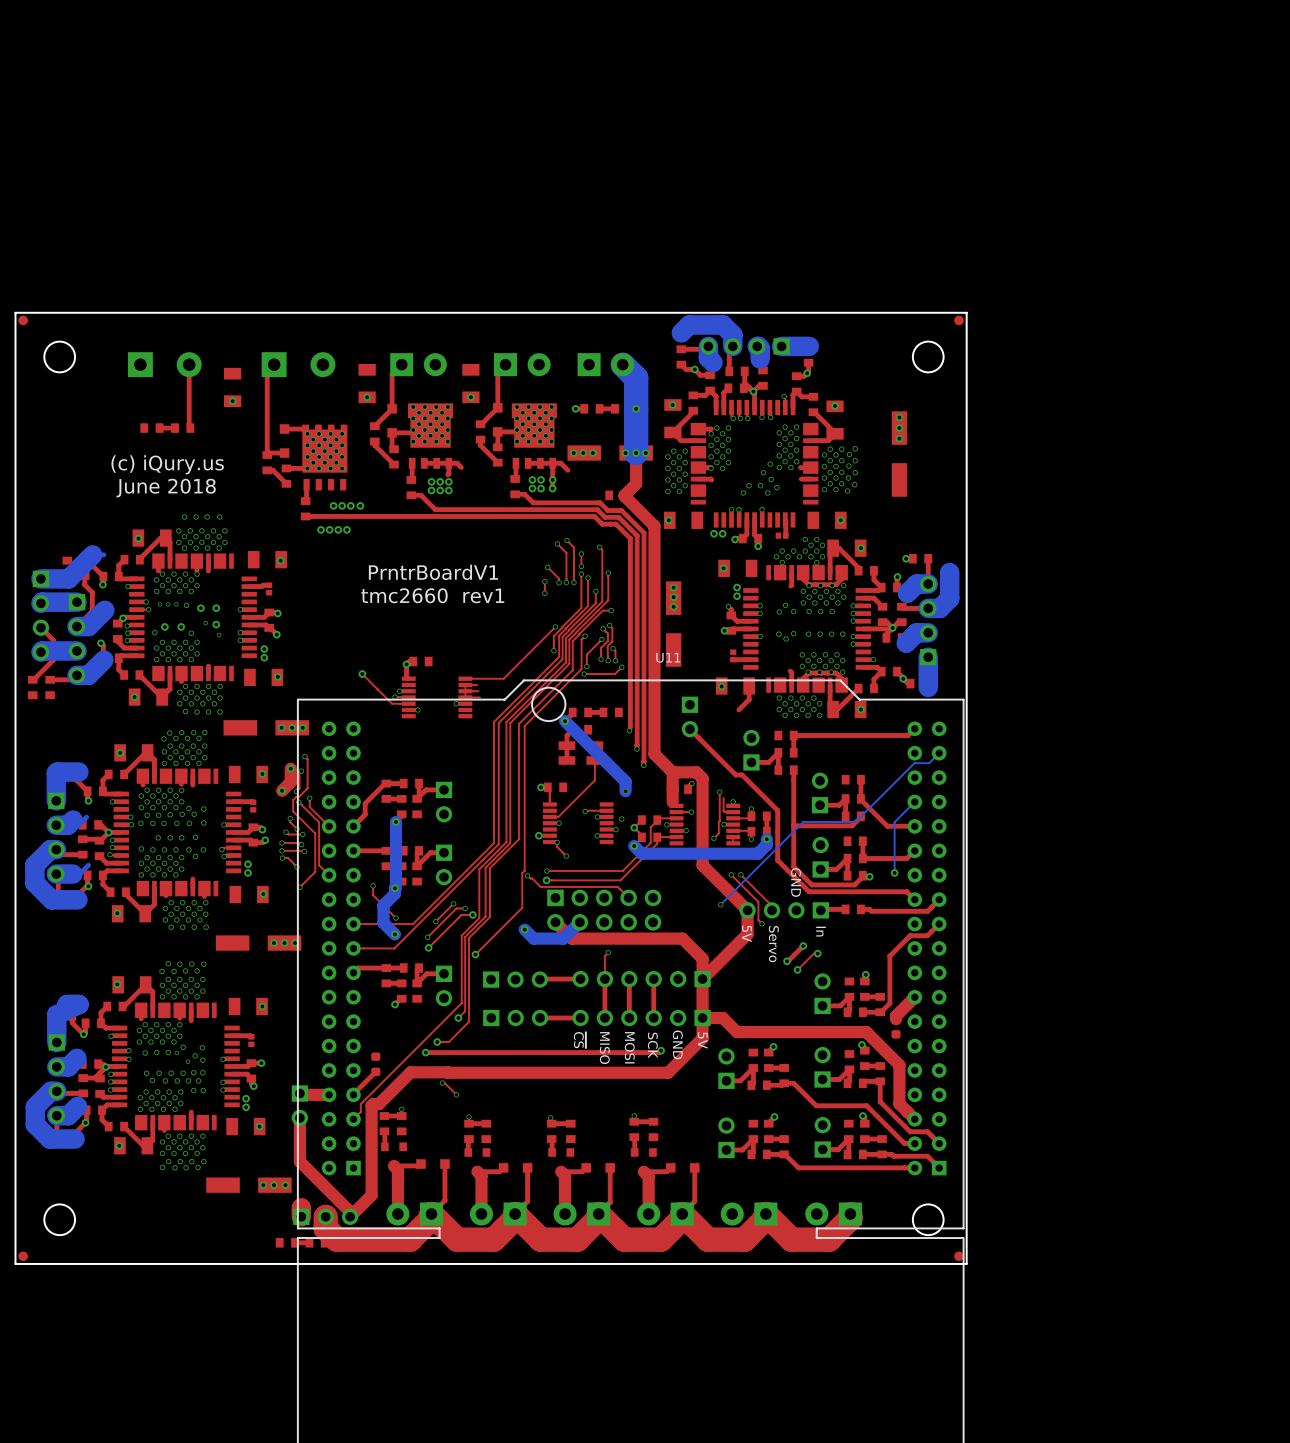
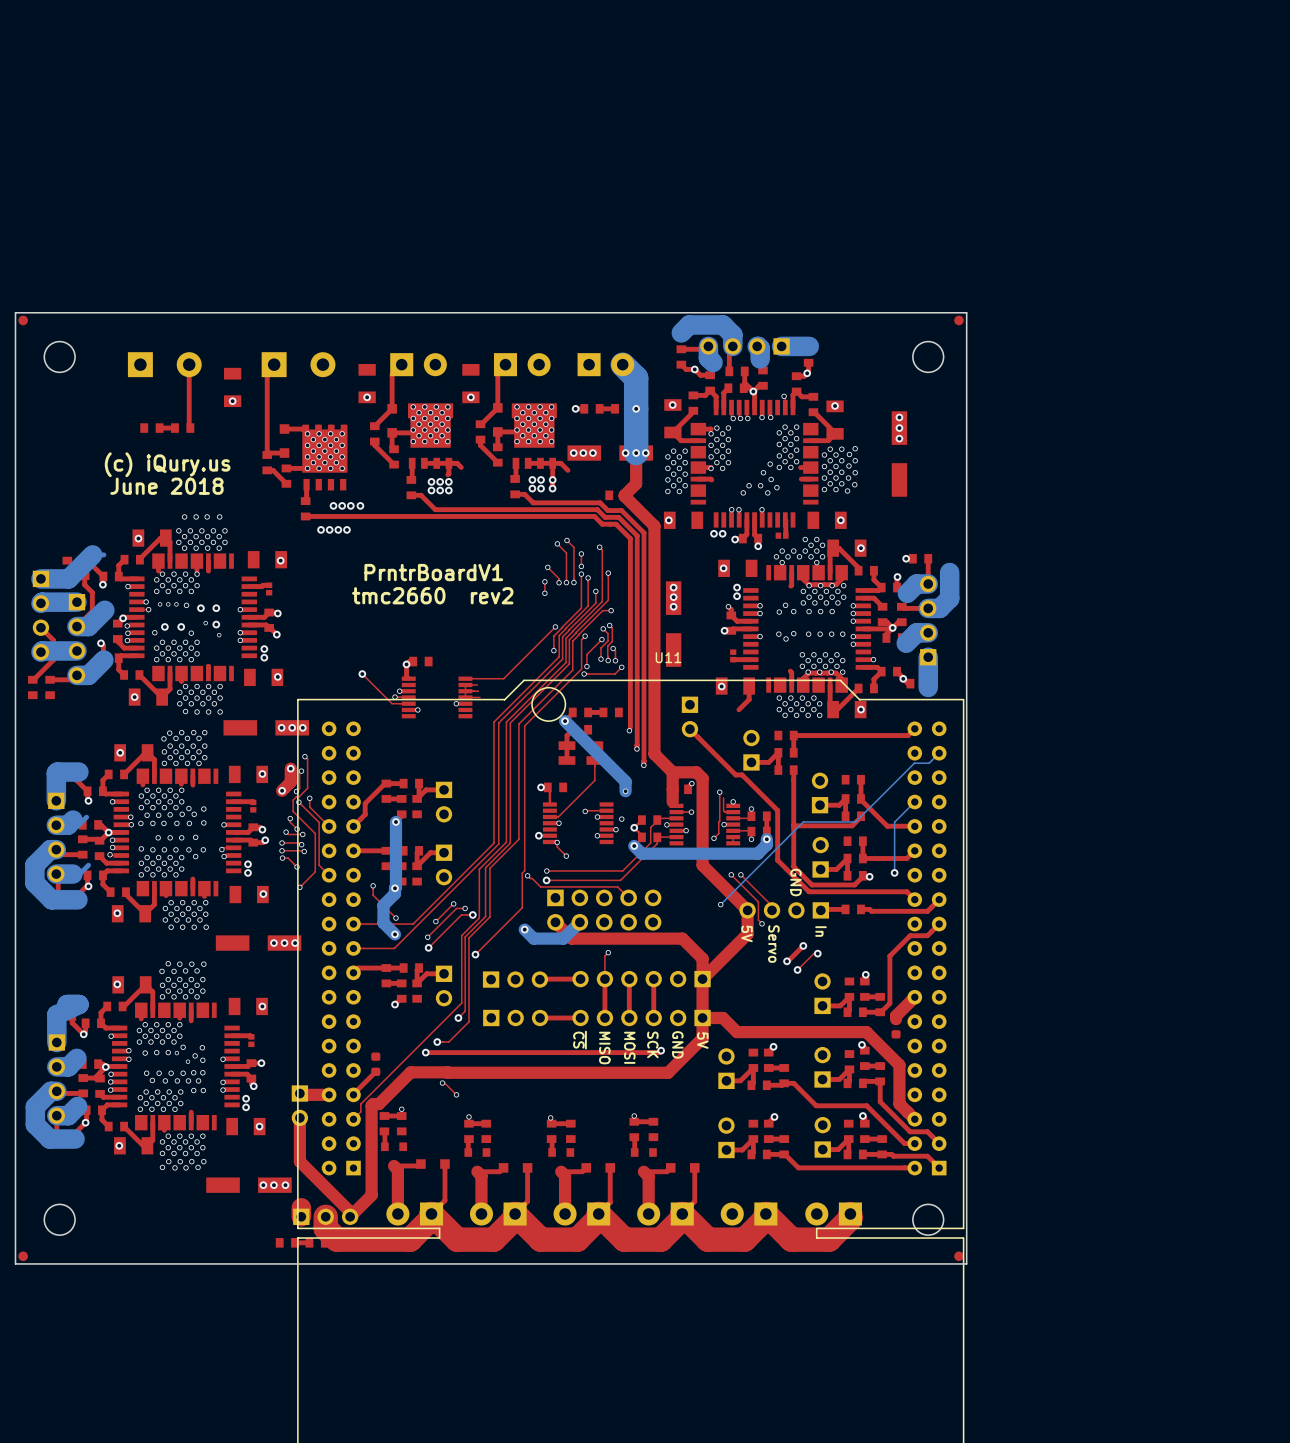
text: tmc2660 rev1 (432, 595) -> tmc2660 rev2 (432, 595)

